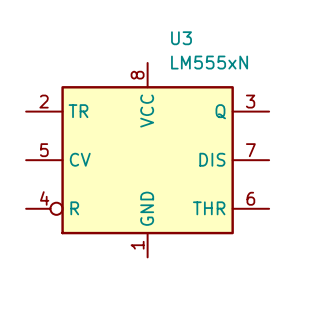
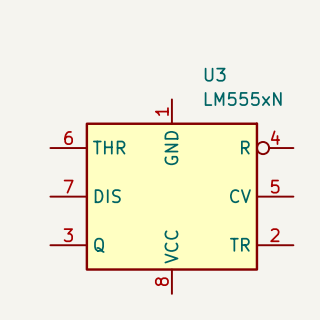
U3 rotation: 0° (147, 160) -> 180° (171, 196)

